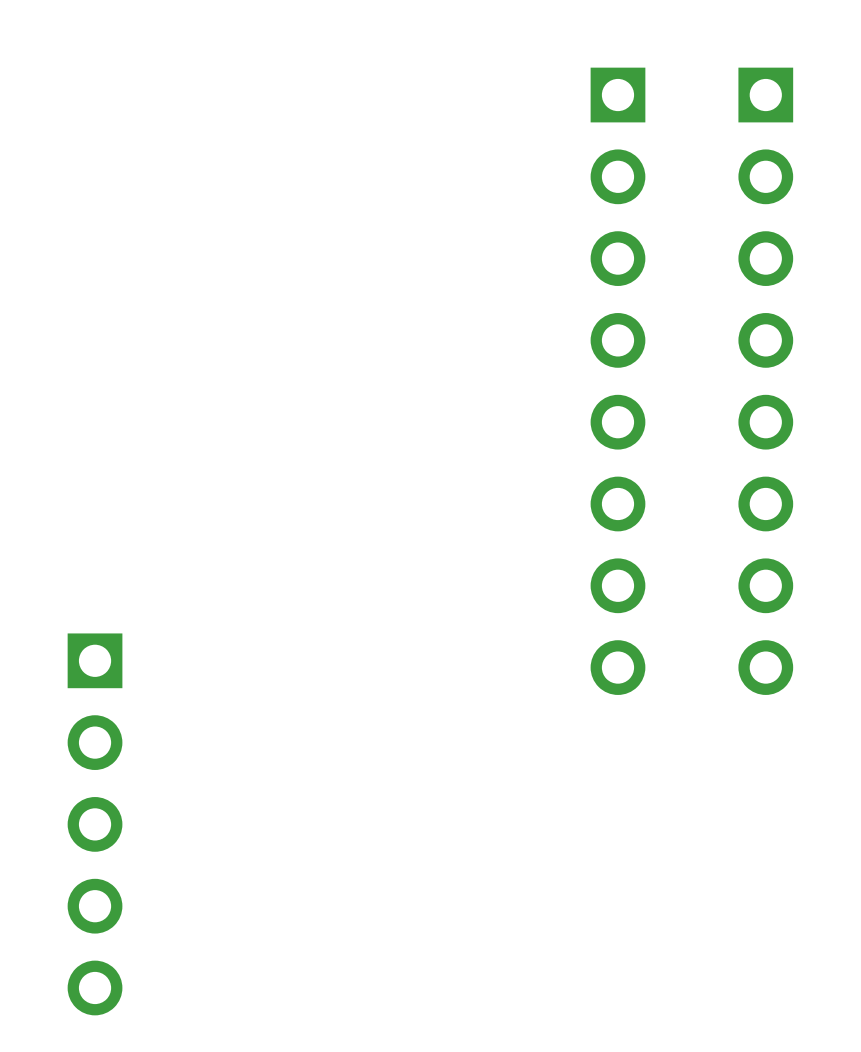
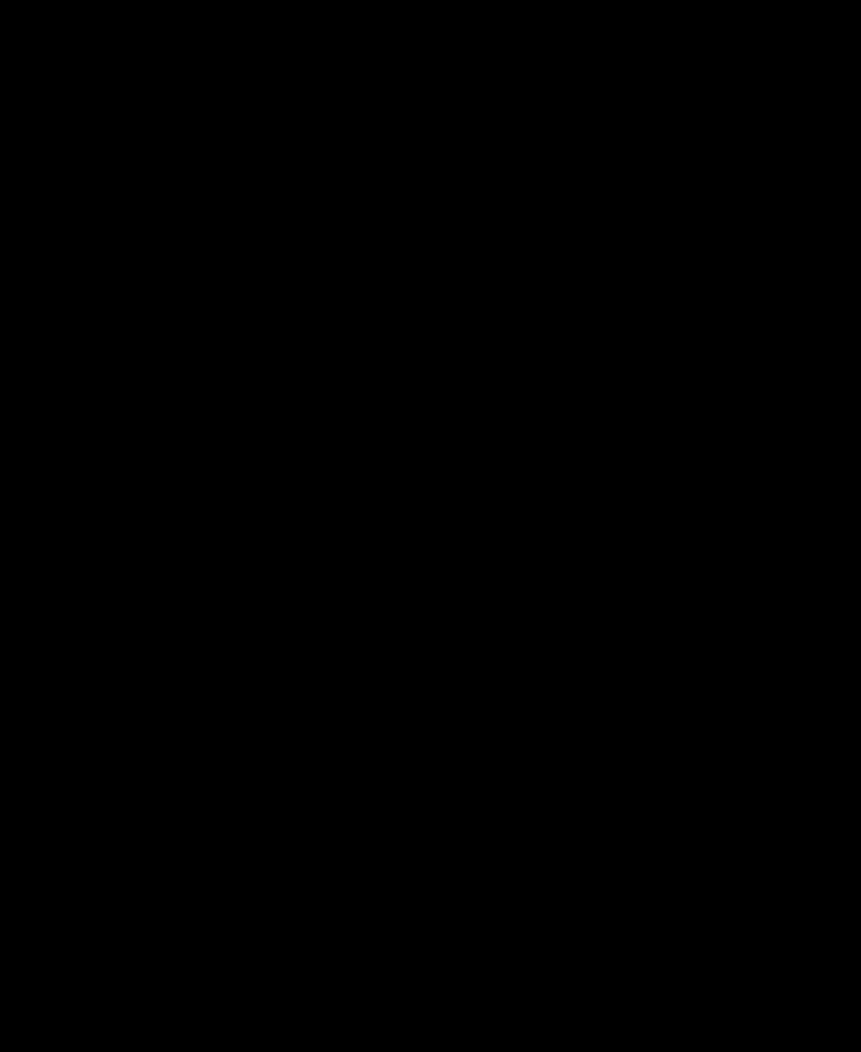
part: (617, 381) -> none
part: (765, 381) -> none
part: (95, 824) -> none

